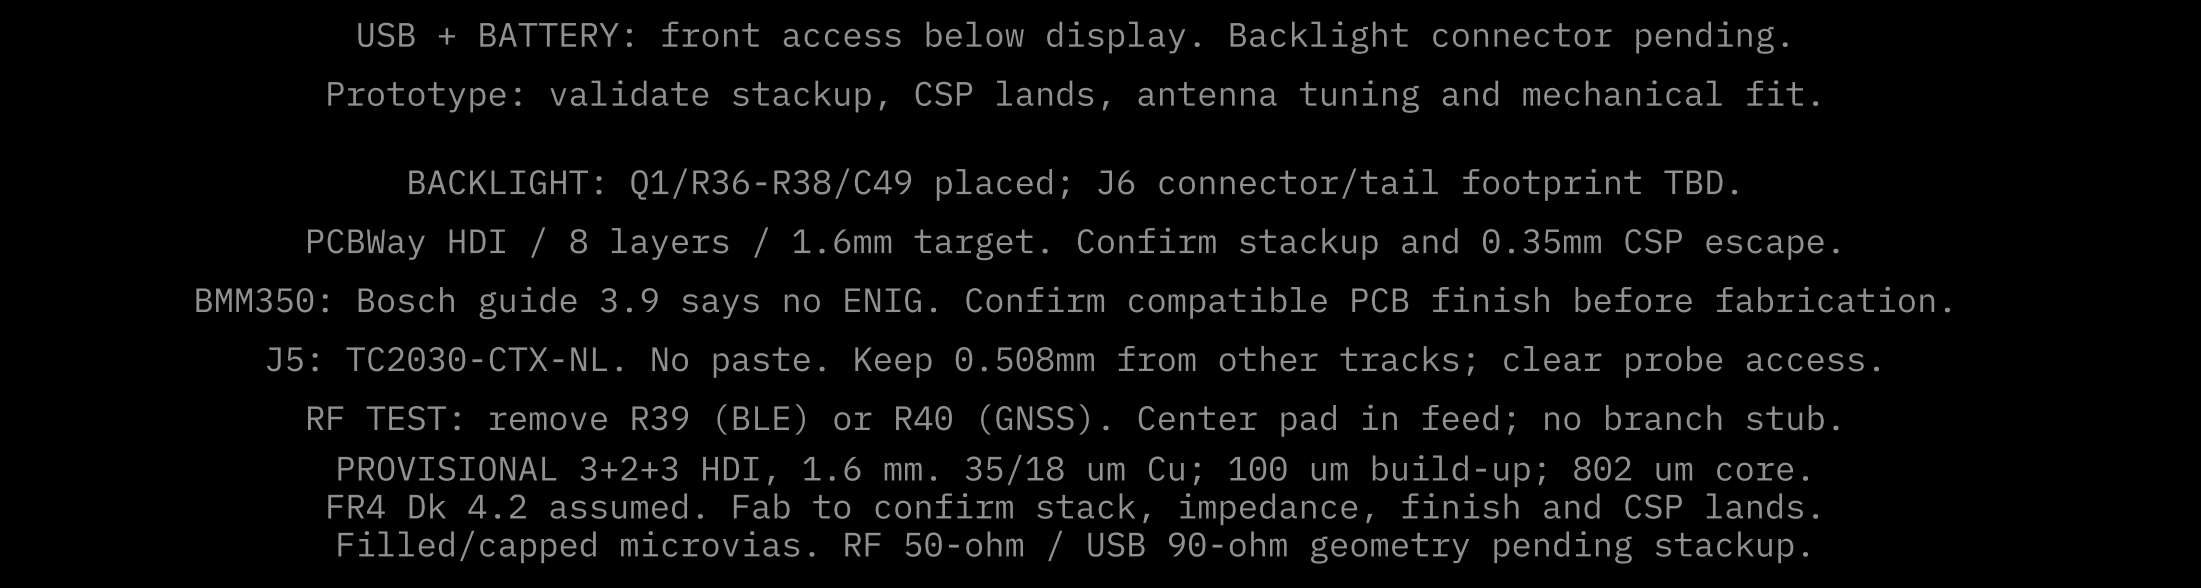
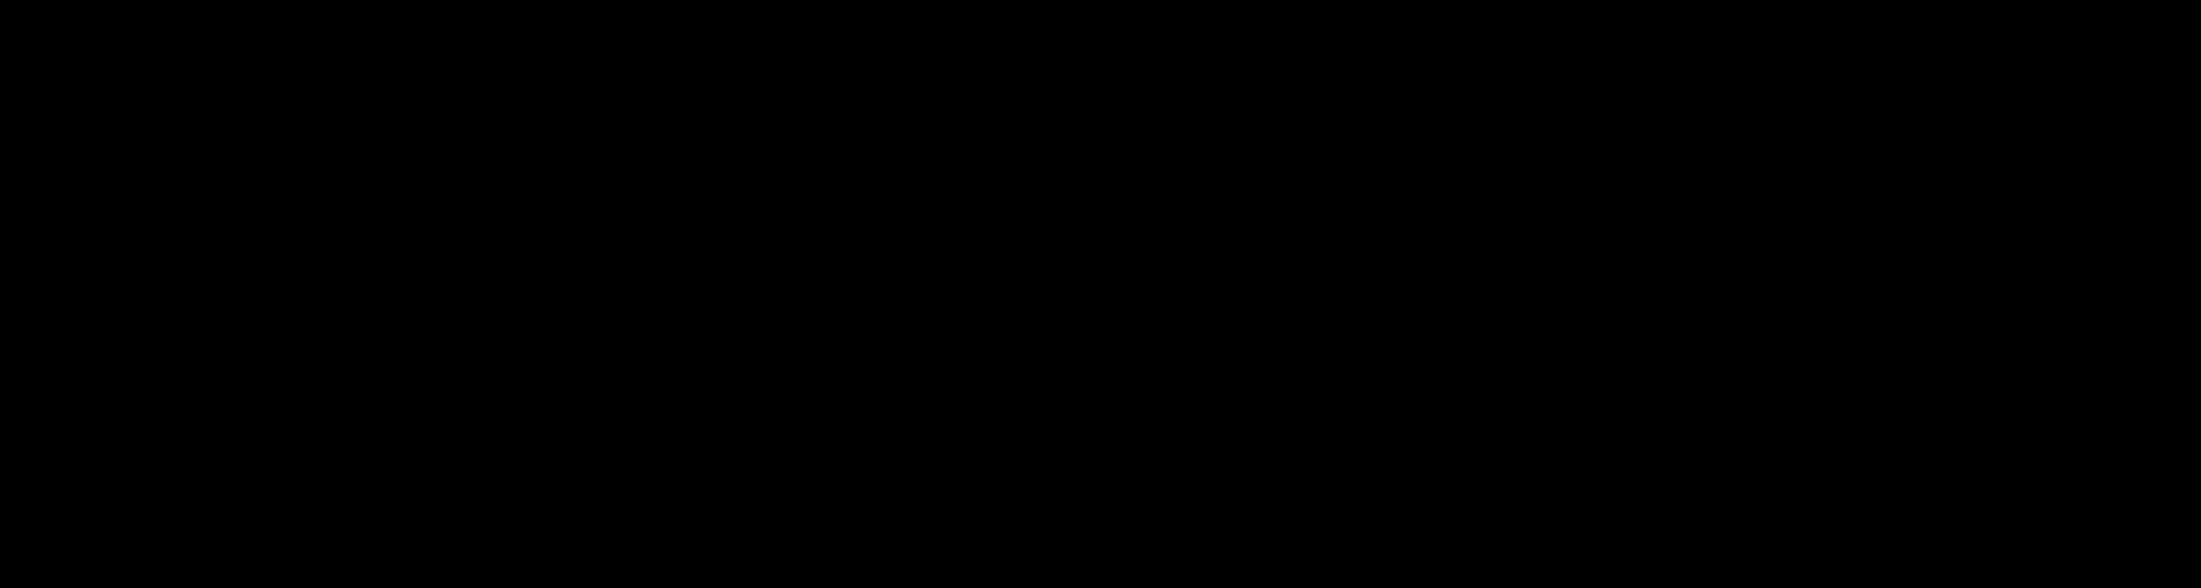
text: USB + BATTERY: front access below display. Backlight connector pending. (1073, 37) -> none
text: Prototype: validate stackup, CSP lands, antenna tuning and mechanical fit. (1073, 96) -> none
text: BACKLIGHT: Q1/R36-R38/C49 placed; J6 connector/tail footprint TBD. (1073, 184) -> none
text: PCBWay HDI / 8 layers / 1.6mm target. Confirm stackup and 0.35mm CSP escape. (1073, 243) -> none
text: BMM350: Bosch guide 3.9 says no ENIG. Confirm compatible PCB finish before fabrication. (1073, 302) -> none
text: J5: TC2030-CTX-NL. No paste. Keep 0.508mm from other tracks; clear probe access. (1072, 361) -> none
text: RF TEST: remove R39 (BLE) or R40 (GNSS). Center pad in feed; no branch stub. (1073, 420) -> none
text: PROVISIONAL 3+2+3 HDI, 1.6 mm. 35/18 um Cu; 100 um build-up; 802 um core. (1073, 471) -> none
text: FR4 Dk 4.2 assumed. Fab to confirm stack, impedance, finish and CSP lands. (1073, 509) -> none
text: Filled/capped microvias. RF 50-ohm / USB 90-ohm geometry pending stackup. (1073, 547) -> none

